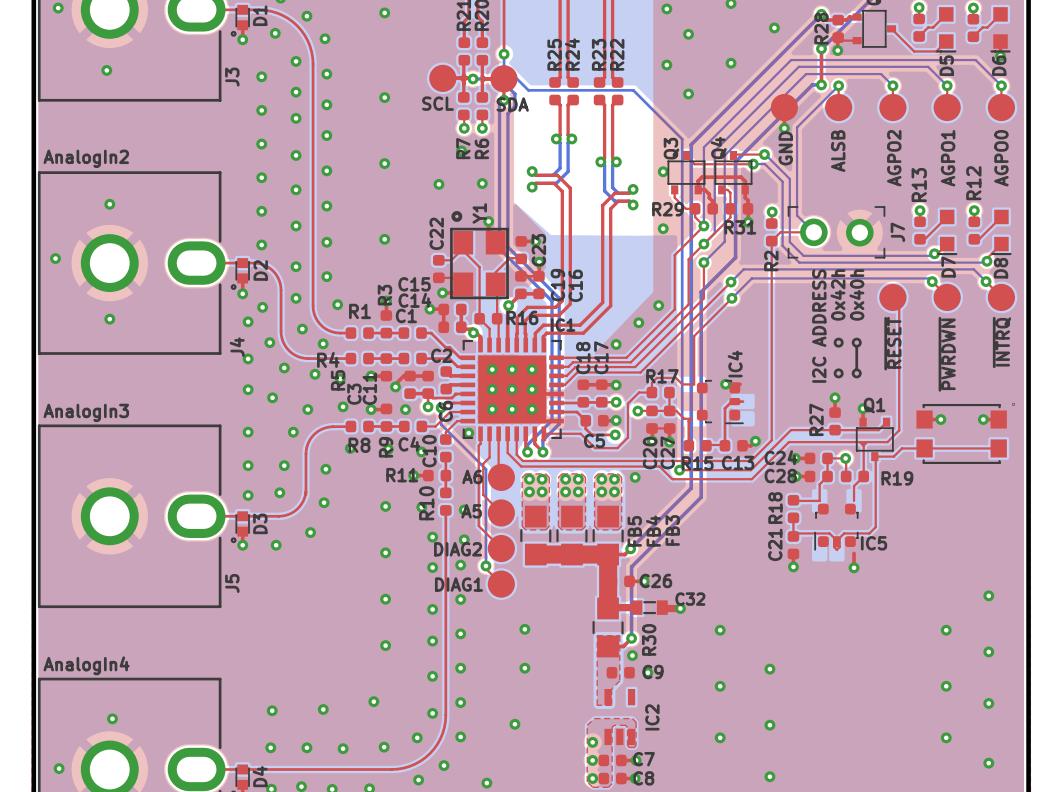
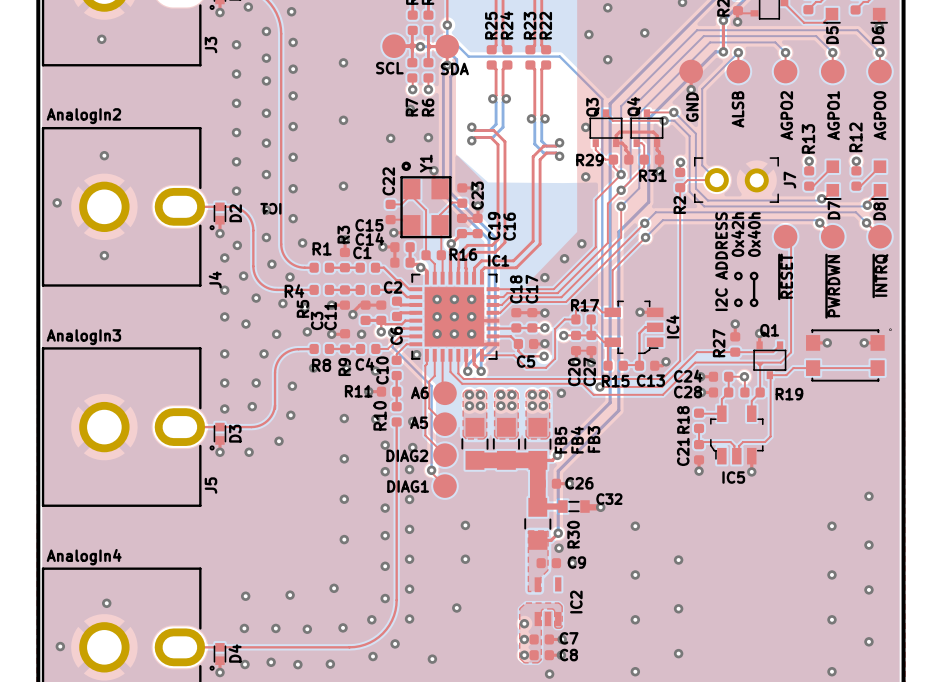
text: none -> IC1 (270, 208)
IC4 name position: IC4 (735, 364) -> IC4 (672, 326)
IC4 footprint: [696, 379, 744, 425] -> [604, 300, 664, 355]
IC5 footprint: [814, 503, 859, 551] -> [710, 405, 764, 465]
IC5 name position: IC5 (874, 543) -> IC5 (733, 477)

